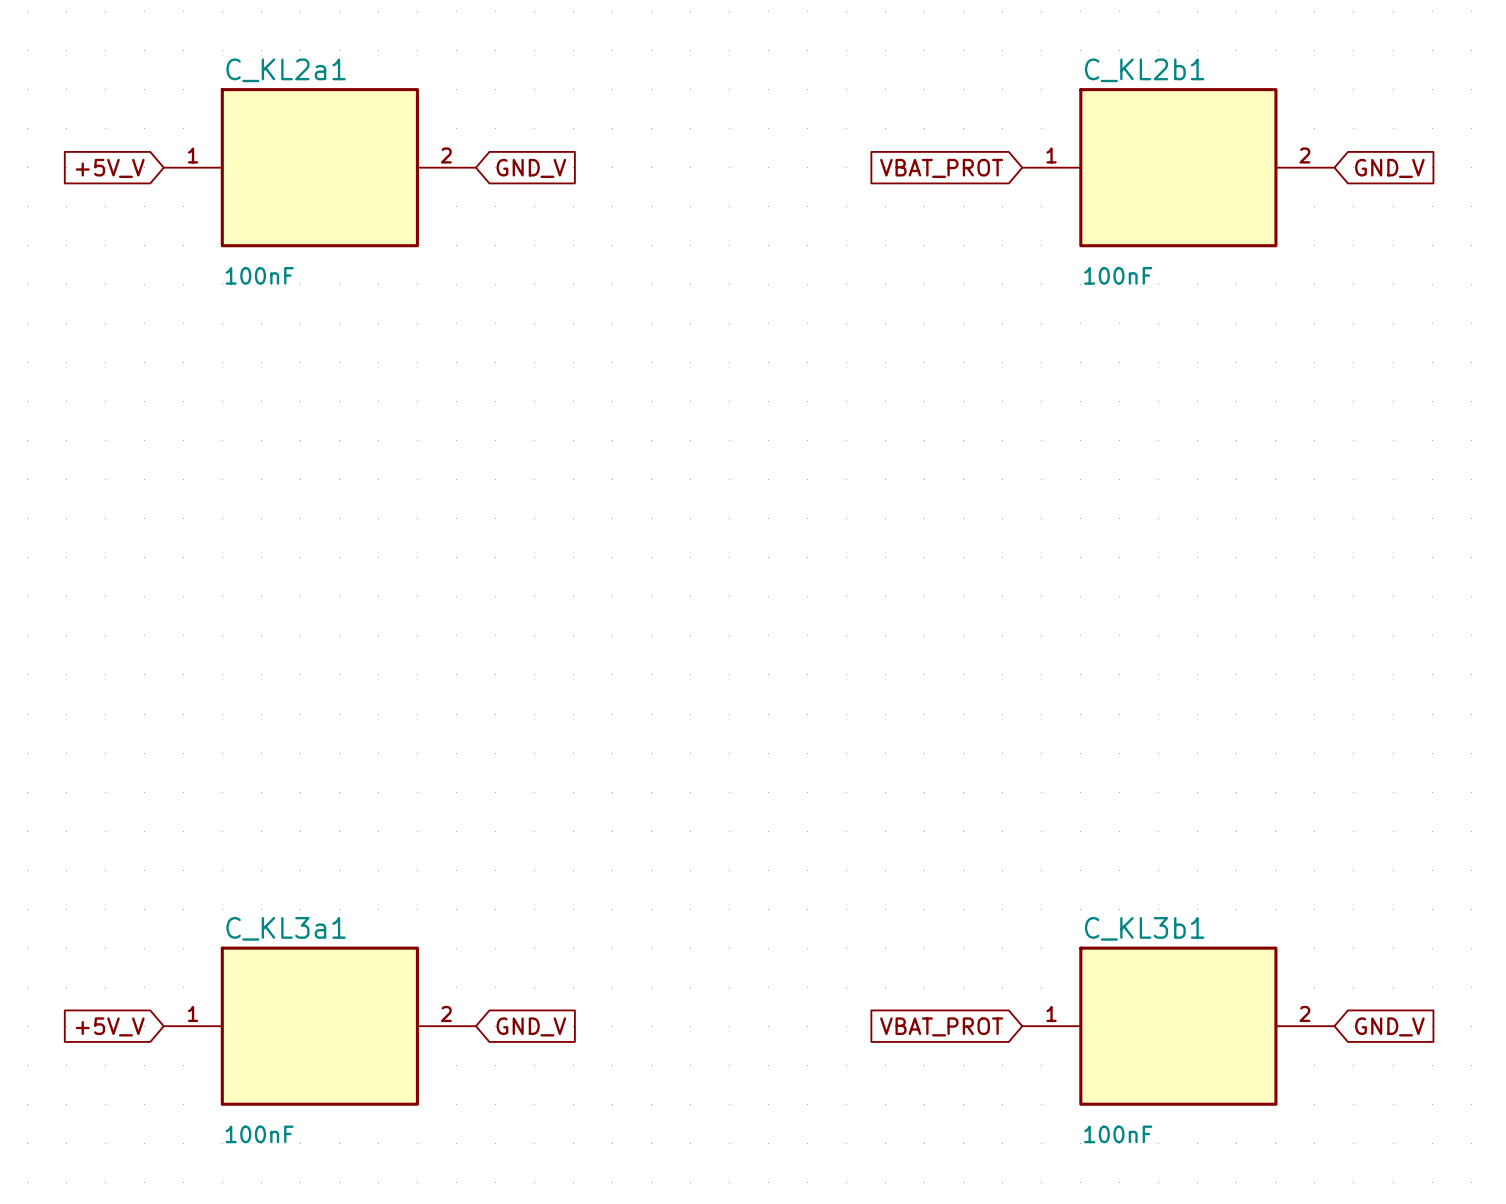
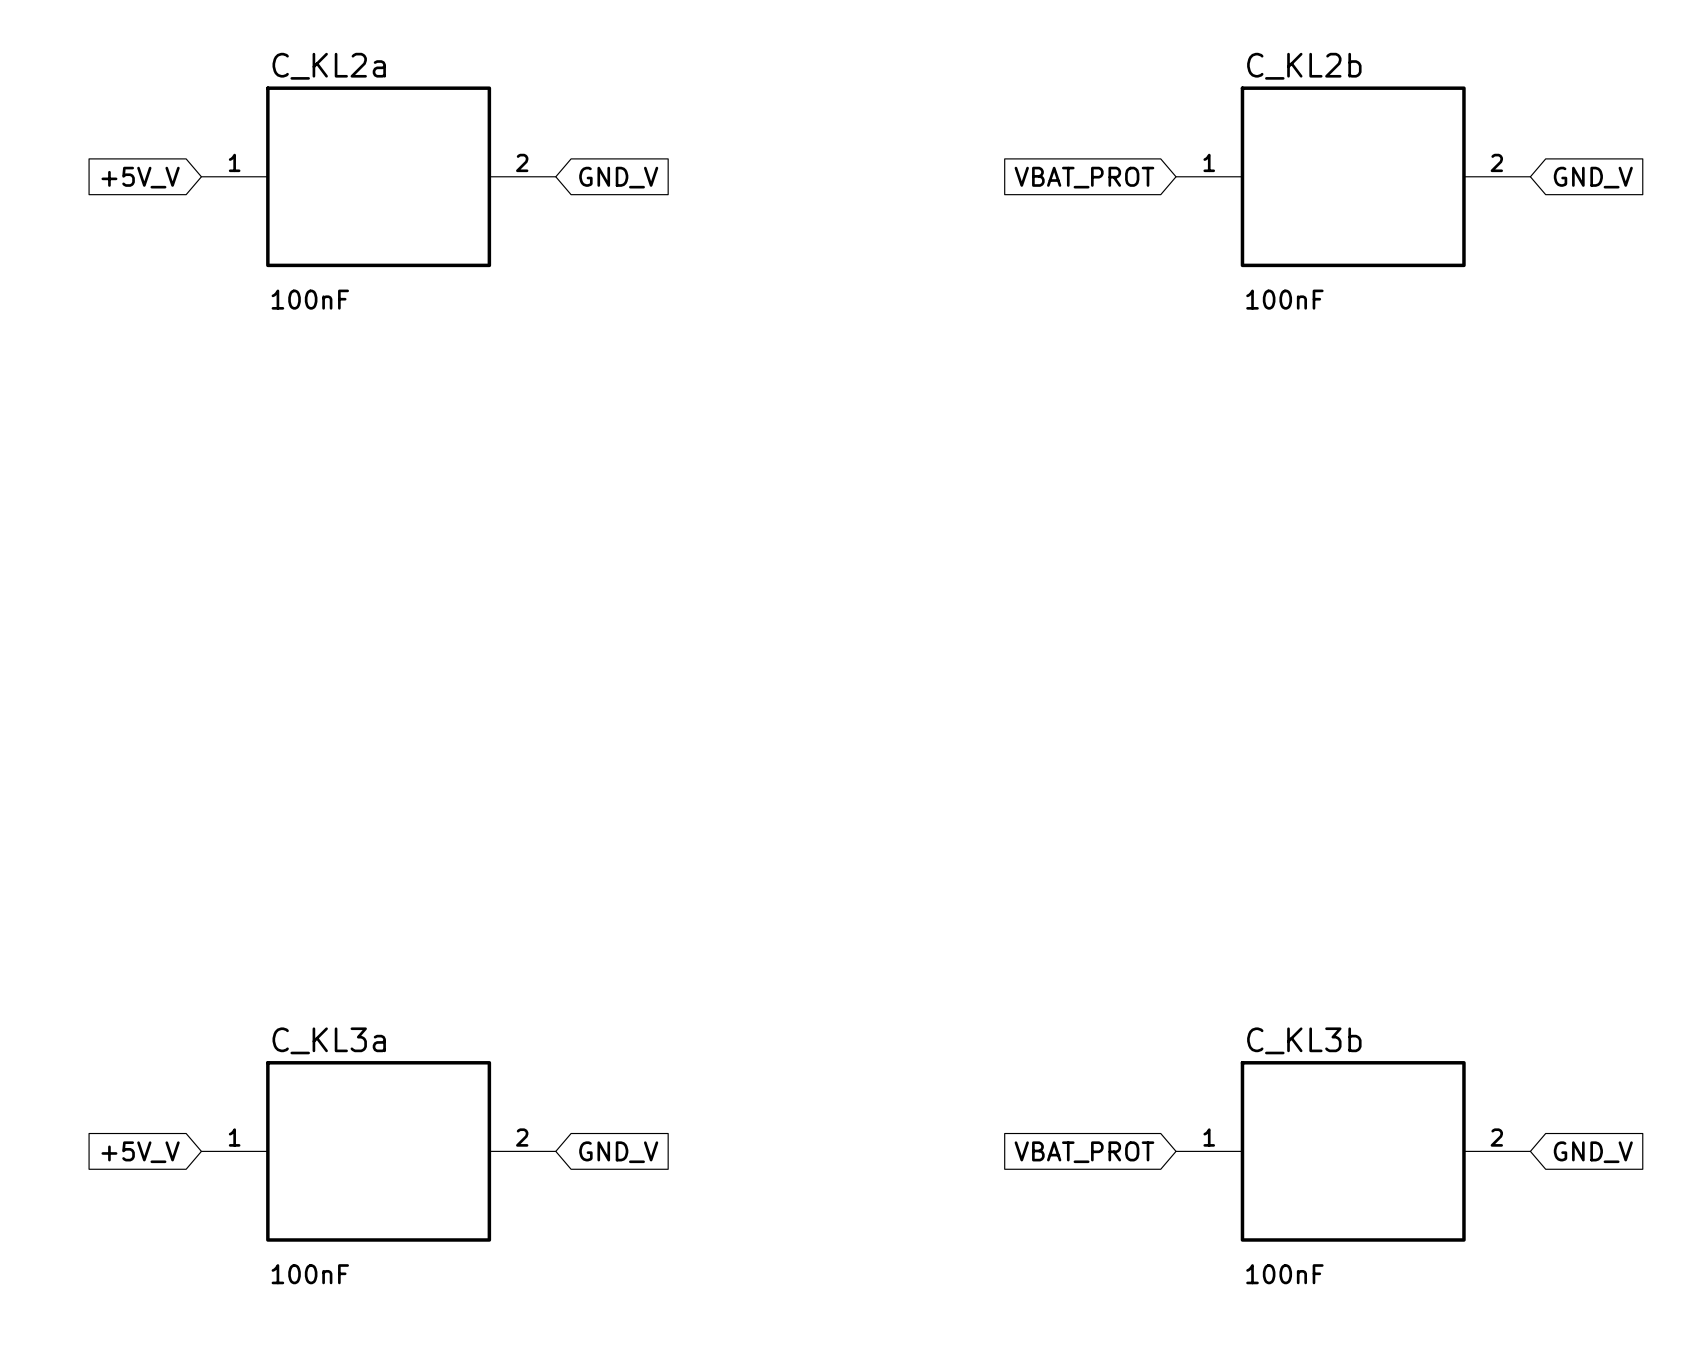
C_KL2a1 name: C_KL2a1 (286, 70) -> C_KL2a (329, 66)
C_KL2b1 name: C_KL2b1 (1144, 70) -> C_KL2b (1304, 66)
C_KL3a1 name: C_KL3a1 (286, 928) -> C_KL3a (329, 1040)
C_KL3b1 name: C_KL3b1 (1144, 928) -> C_KL3b (1304, 1040)

